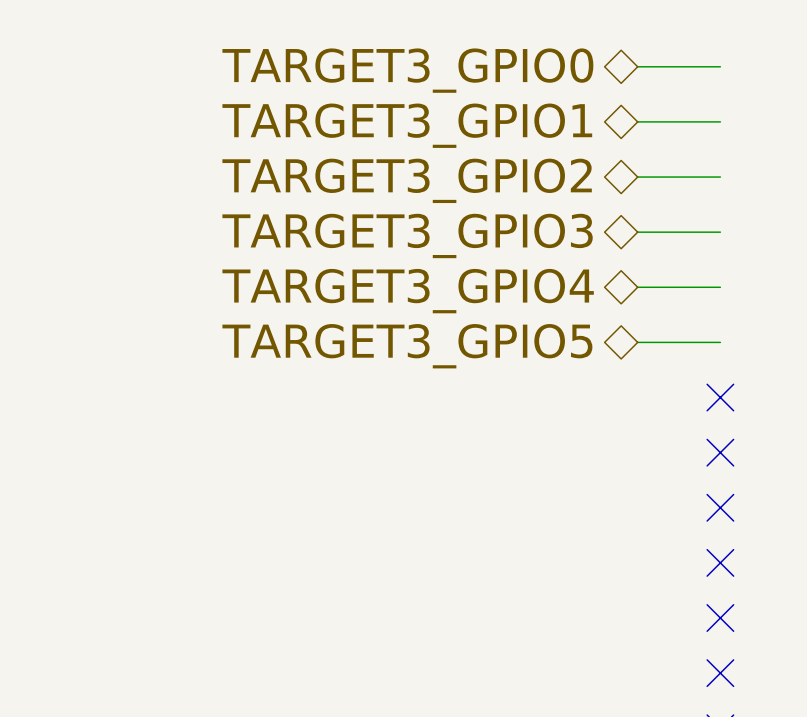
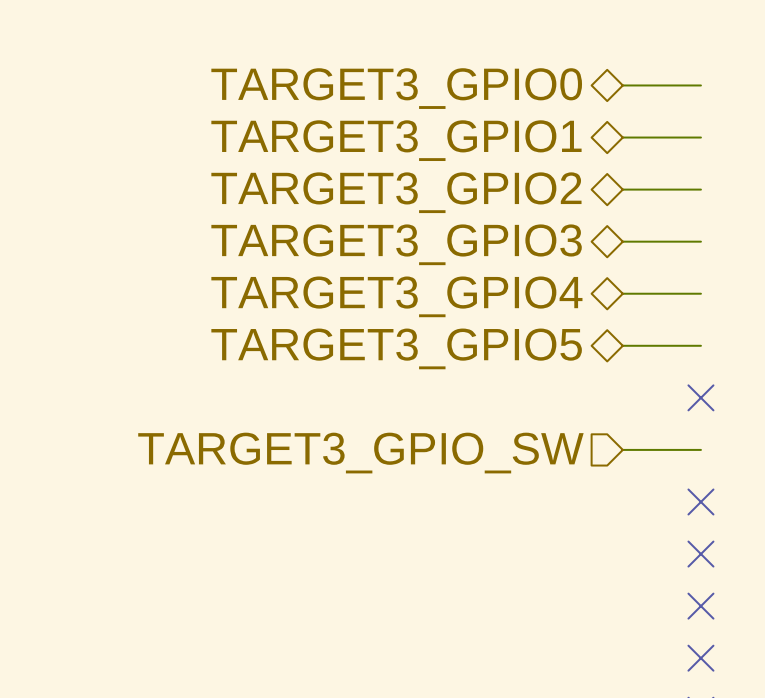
wire: none -> (622, 449) (700, 449)
no-connect mark: (720, 452) -> none
hierarchical label: none -> TARGET3_GPIO_SW (360, 453)

